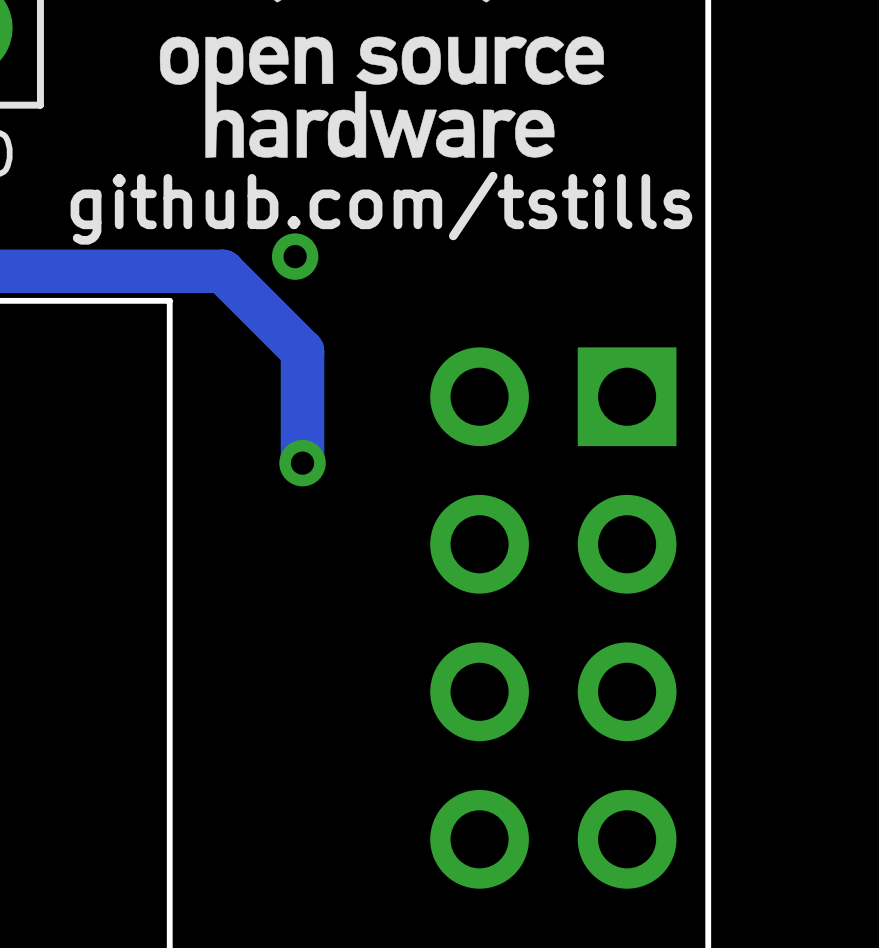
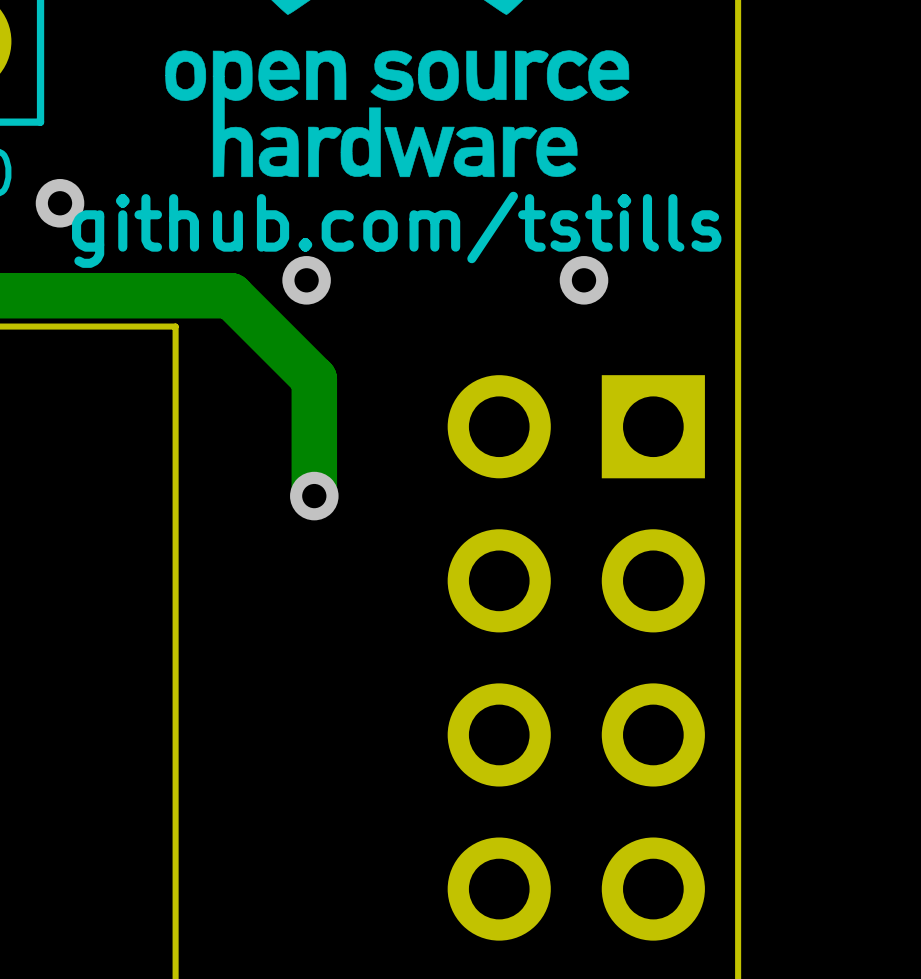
via: none -> (60, 203)
via: none -> (584, 280)

